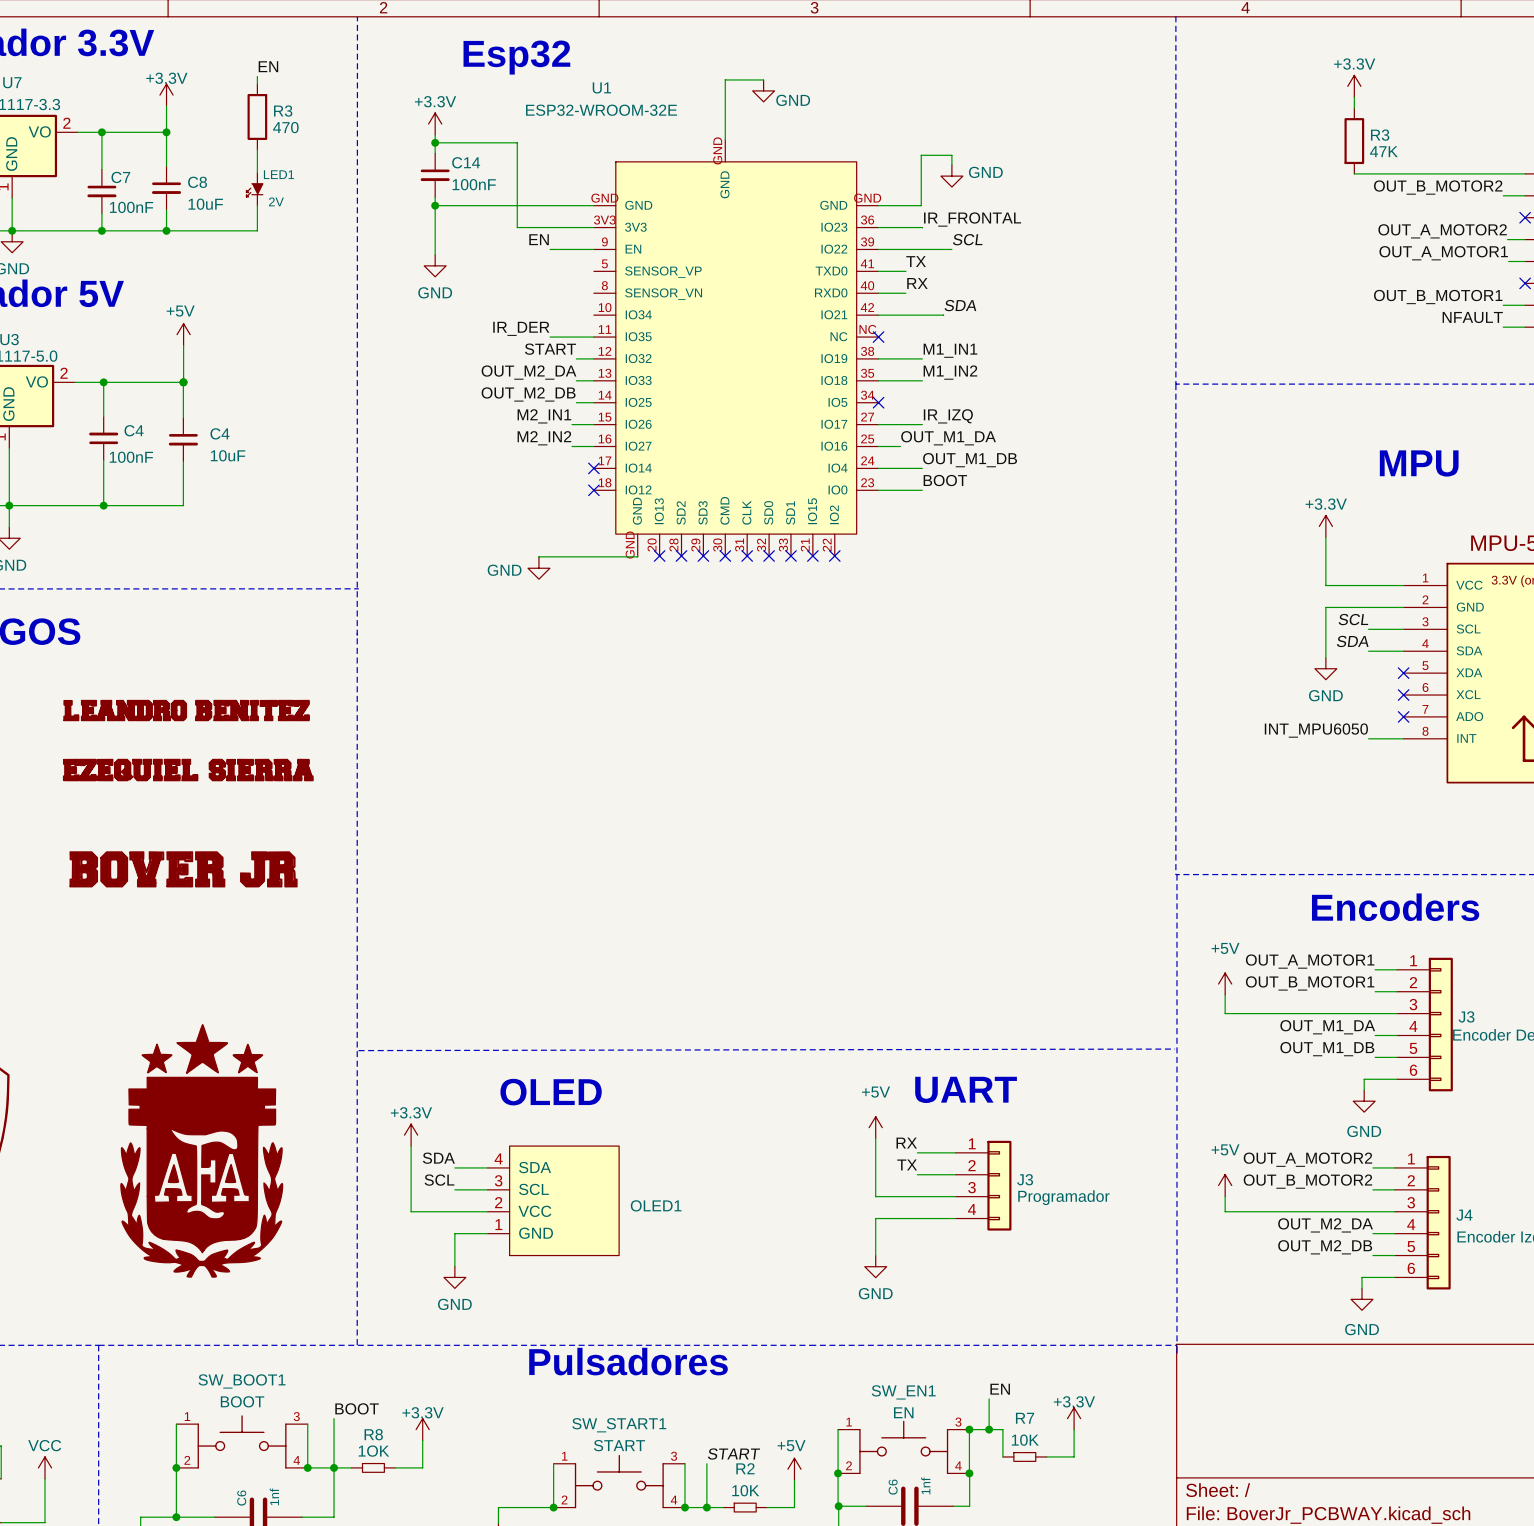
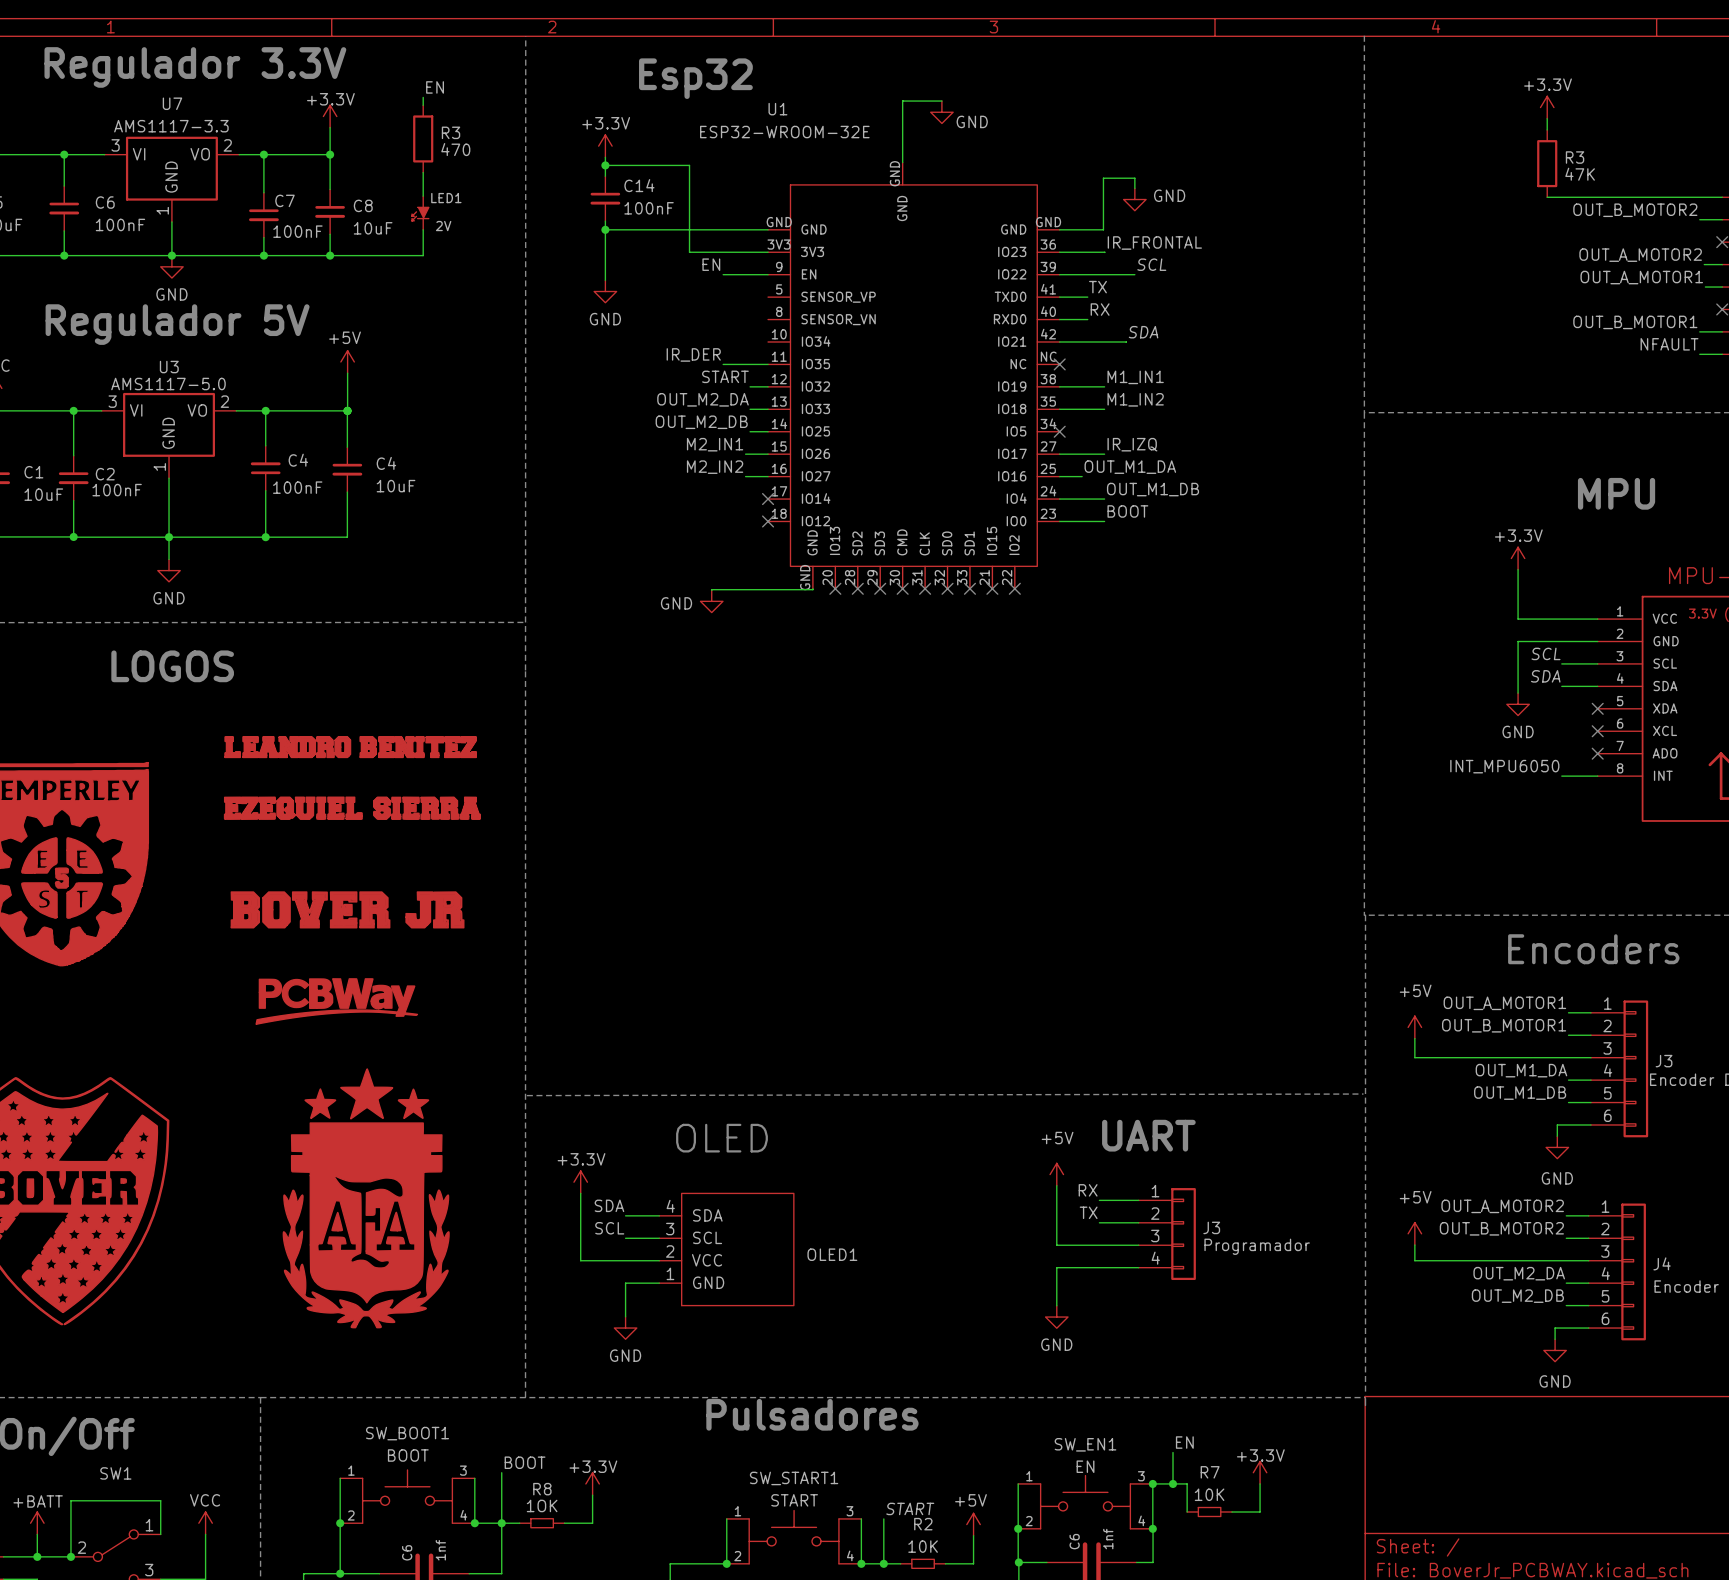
part: none -> (336, 1001)

